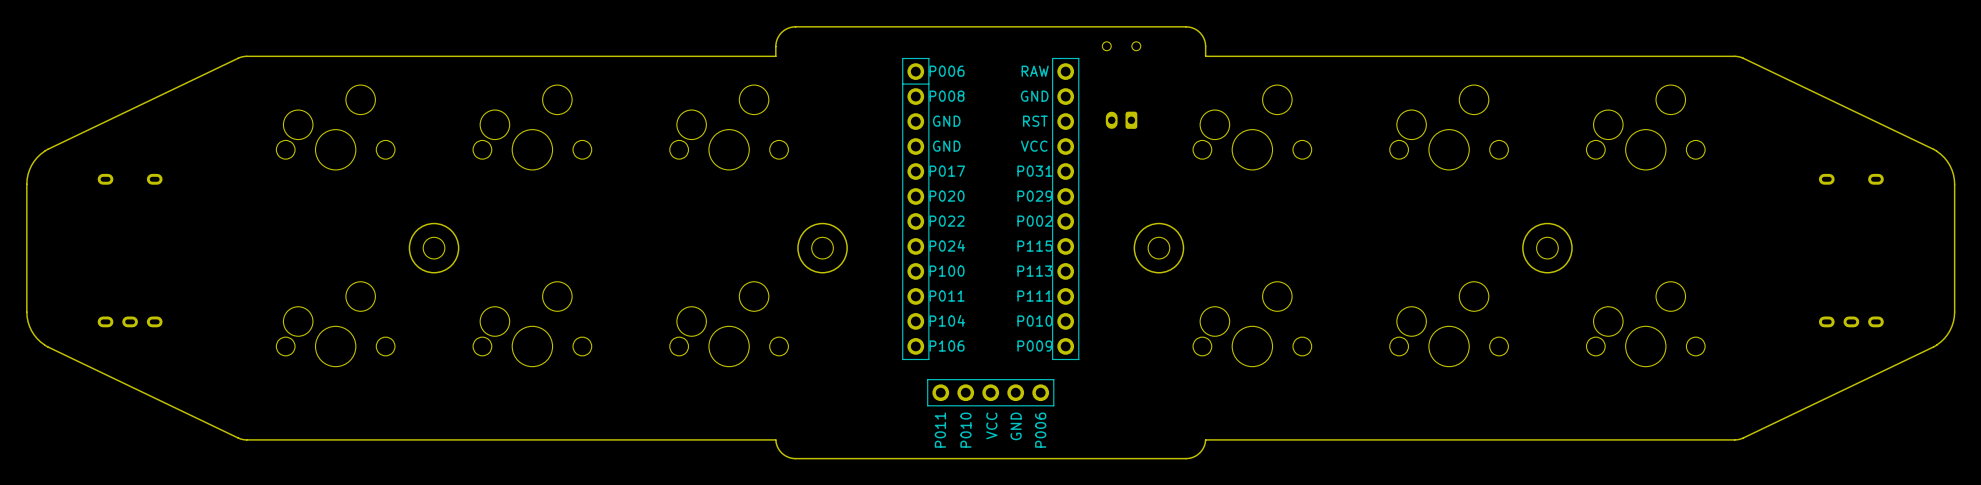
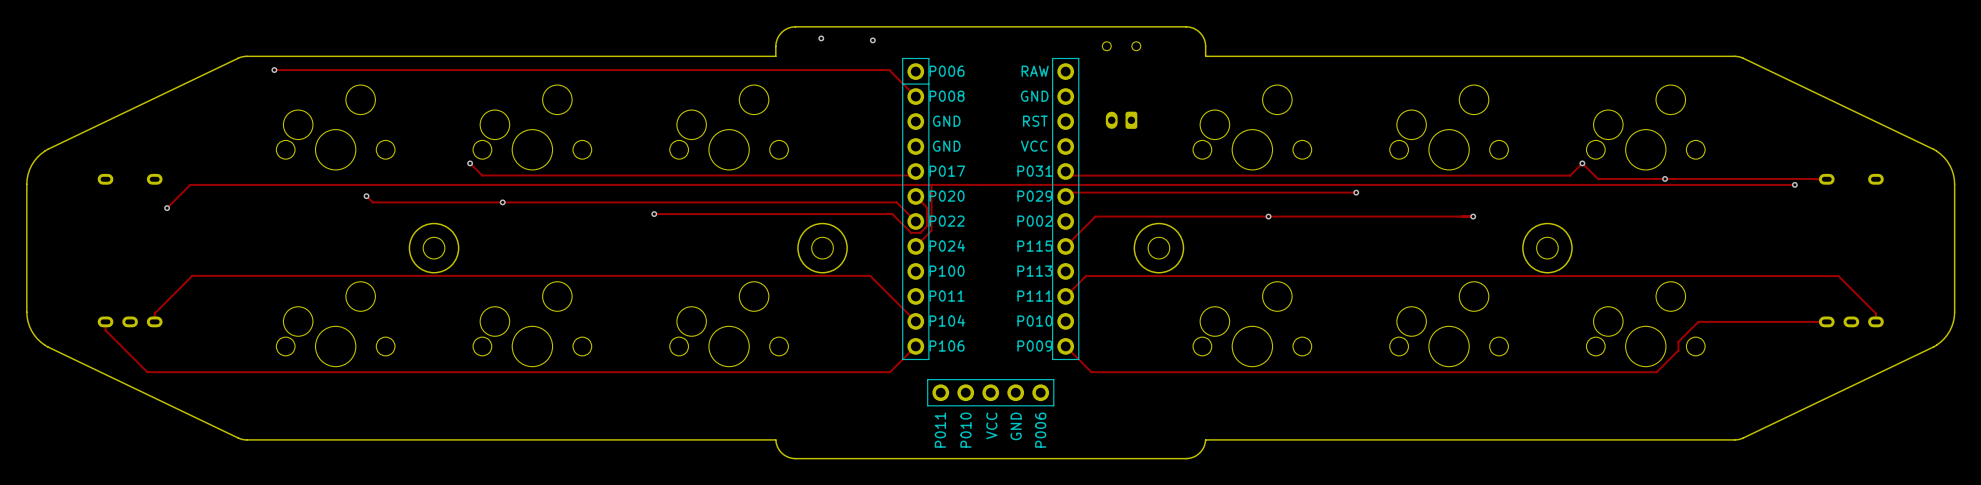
via: none -> (821, 38)
via: none -> (872, 40)
track: none -> (274, 70) (889, 70) (915, 96)
via: none -> (274, 70)
track: none -> (470, 163) (482, 175) (911, 175) (915, 171)
via: none -> (470, 163)
via: none -> (1582, 163)
track: none -> (1065, 171) (1069, 175) (1570, 175) (1582, 163) (1597, 178) (1826, 179)
via: none -> (1665, 178)
track: none -> (931, 184) (931, 230) (915, 246)
track: none -> (1794, 184) (190, 184) (167, 208)
via: none -> (1794, 184)
track: none -> (1356, 192) (1069, 192) (1065, 196)
via: none -> (1356, 192)
track: none -> (366, 196) (372, 202) (896, 202) (915, 221)
via: none -> (366, 196)
track: none -> (915, 196) (927, 207) (927, 226) (920, 232) (911, 232) (892, 214) (654, 214)
via: none -> (502, 202)
via: none -> (167, 208)
via: none -> (654, 214)
via: none -> (1268, 216)
track: none -> (1473, 216) (1095, 216) (1065, 246)
via: none -> (1473, 216)
track: none -> (1065, 296) (1086, 276) (1838, 276) (1875, 313) (1875, 321)
track: none -> (105, 321) (105, 330) (147, 372) (889, 372) (915, 346)
track: none -> (915, 321) (870, 275) (192, 275) (154, 313) (154, 321)
track: none -> (1826, 321) (1698, 321) (1678, 341) (1678, 350) (1656, 372) (1091, 372) (1065, 346)

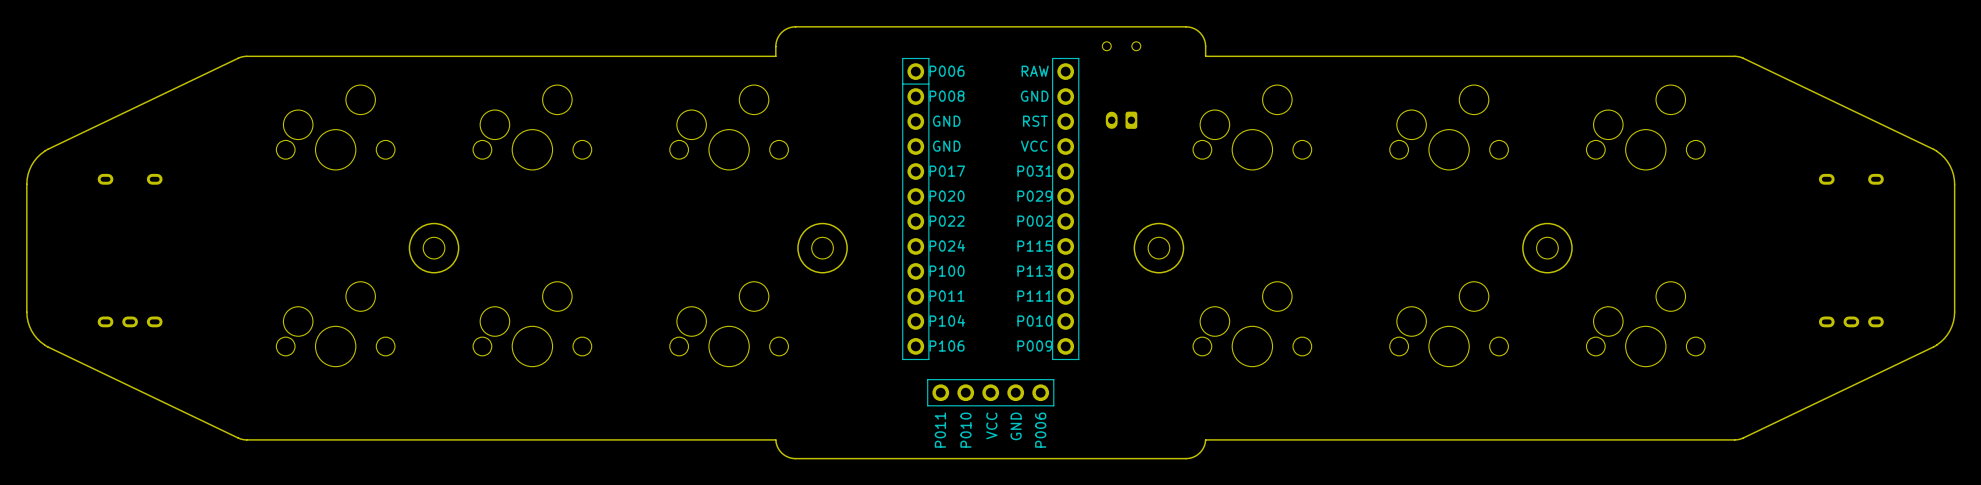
via: (821, 38) -> none
via: (872, 40) -> none
track: (274, 70) (889, 70) (915, 96) -> none
via: (274, 70) -> none
track: (470, 163) (482, 175) (911, 175) (915, 171) -> none
via: (470, 163) -> none
via: (1582, 163) -> none
track: (1065, 171) (1069, 175) (1570, 175) (1582, 163) (1597, 178) (1826, 179) -> none
via: (1665, 178) -> none
track: (931, 184) (931, 230) (915, 246) -> none
track: (1794, 184) (190, 184) (167, 208) -> none
via: (1794, 184) -> none
track: (1356, 192) (1069, 192) (1065, 196) -> none
via: (1356, 192) -> none
track: (366, 196) (372, 202) (896, 202) (915, 221) -> none
via: (366, 196) -> none
track: (915, 196) (927, 207) (927, 226) (920, 232) (911, 232) (892, 214) (654, 214) -> none
via: (502, 202) -> none
via: (167, 208) -> none
via: (654, 214) -> none
via: (1268, 216) -> none
track: (1473, 216) (1095, 216) (1065, 246) -> none
via: (1473, 216) -> none
track: (1065, 296) (1086, 276) (1838, 276) (1875, 313) (1875, 321) -> none
track: (105, 321) (105, 330) (147, 372) (889, 372) (915, 346) -> none
track: (915, 321) (870, 275) (192, 275) (154, 313) (154, 321) -> none
track: (1826, 321) (1698, 321) (1678, 341) (1678, 350) (1656, 372) (1091, 372) (1065, 346) -> none

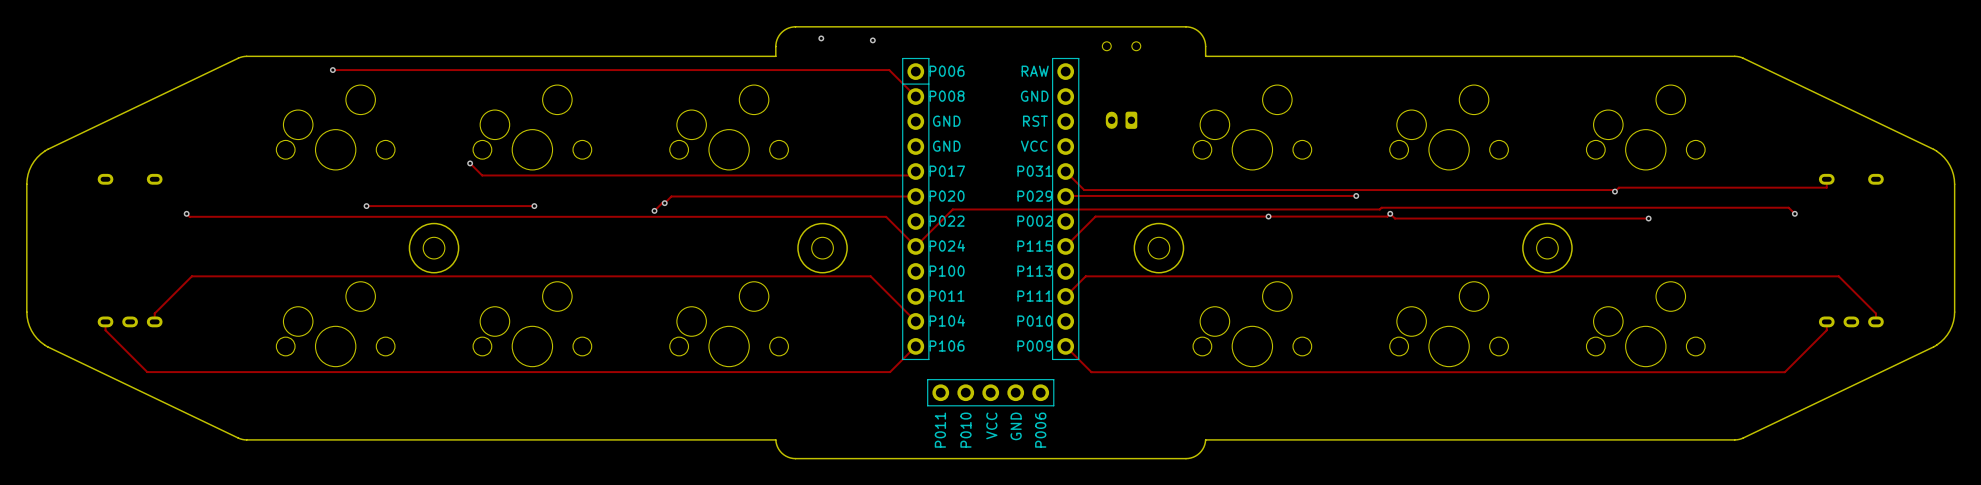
via: none -> (821, 38)
via: none -> (872, 40)
track: none -> (332, 70) (889, 70) (915, 96)
via: none -> (332, 70)
track: none -> (470, 163) (482, 175) (911, 175) (915, 171)
via: none -> (470, 163)
track: none -> (1065, 171) (1084, 190) (1613, 190) (1614, 191) (1618, 187) (1826, 187) (1826, 179)
via: none -> (1614, 191)
track: none -> (1356, 195) (1065, 196)
via: none -> (1356, 195)
track: none -> (915, 196) (671, 196) (654, 210)
via: none -> (664, 203)
track: none -> (366, 206) (534, 206)
via: none -> (366, 206)
via: none -> (534, 206)
via: none -> (654, 210)
track: none -> (186, 213) (189, 216) (886, 216) (915, 246) (952, 209) (1788, 207) (1794, 213)
via: none -> (186, 213)
via: none -> (1390, 213)
via: none -> (1794, 213)
via: none -> (1268, 216)
track: none -> (1648, 218) (1394, 218) (1390, 213) (1387, 216) (1095, 216) (1065, 246)
via: none -> (1648, 218)
track: none -> (1065, 296) (1085, 276) (1838, 276) (1875, 313) (1875, 321)
track: none -> (105, 321) (105, 330) (147, 372) (890, 372) (915, 346)
track: none -> (915, 321) (870, 276) (191, 276) (154, 313) (154, 321)
track: none -> (1826, 321) (1826, 330) (1784, 372) (1091, 372) (1065, 346)

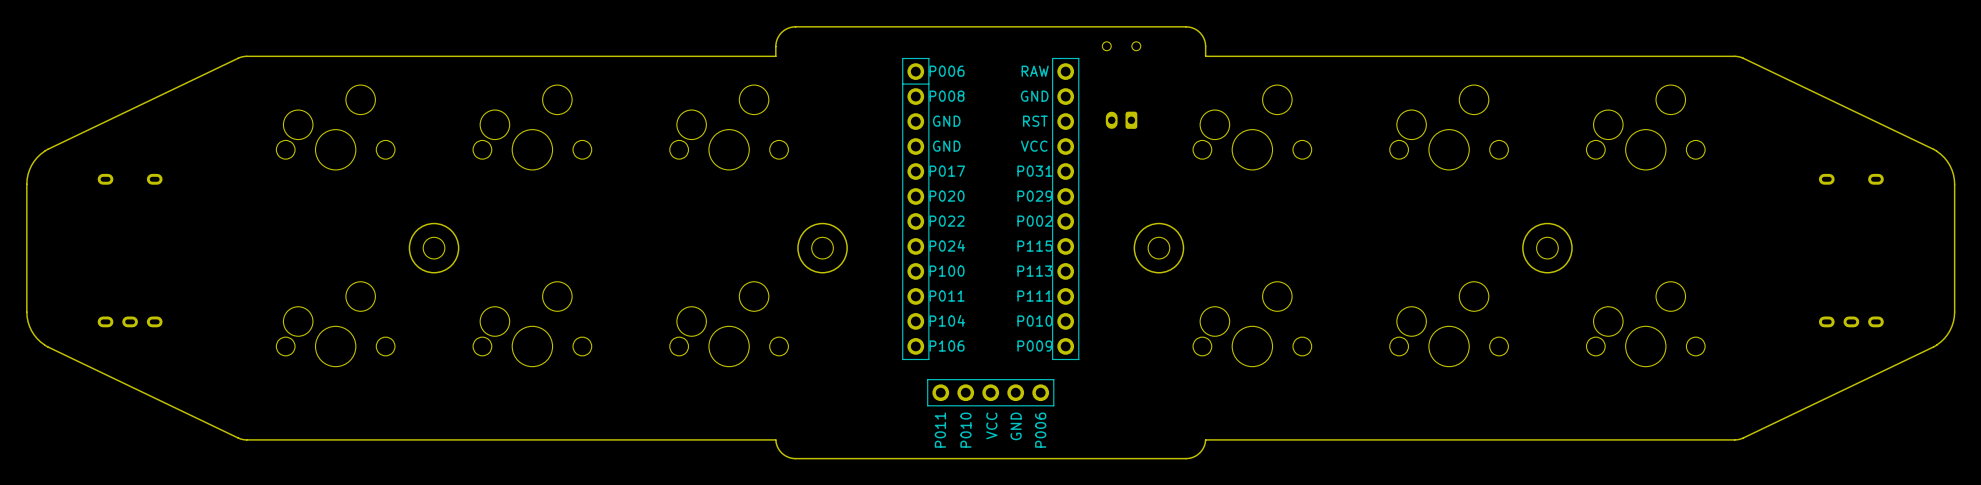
via: (821, 38) -> none
via: (872, 40) -> none
track: (332, 70) (889, 70) (915, 96) -> none
via: (332, 70) -> none
track: (470, 163) (482, 175) (911, 175) (915, 171) -> none
via: (470, 163) -> none
track: (1065, 171) (1084, 190) (1613, 190) (1614, 191) (1618, 187) (1826, 187) (1826, 179) -> none
via: (1614, 191) -> none
track: (1356, 195) (1065, 196) -> none
via: (1356, 195) -> none
track: (915, 196) (671, 196) (654, 210) -> none
via: (664, 203) -> none
track: (366, 206) (534, 206) -> none
via: (366, 206) -> none
via: (534, 206) -> none
via: (654, 210) -> none
track: (186, 213) (189, 216) (886, 216) (915, 246) (952, 209) (1788, 207) (1794, 213) -> none
via: (186, 213) -> none
via: (1390, 213) -> none
via: (1794, 213) -> none
via: (1268, 216) -> none
track: (1648, 218) (1394, 218) (1390, 213) (1387, 216) (1095, 216) (1065, 246) -> none
via: (1648, 218) -> none
track: (1065, 296) (1085, 276) (1838, 276) (1875, 313) (1875, 321) -> none
track: (105, 321) (105, 330) (147, 372) (890, 372) (915, 346) -> none
track: (915, 321) (870, 276) (191, 276) (154, 313) (154, 321) -> none
track: (1826, 321) (1826, 330) (1784, 372) (1091, 372) (1065, 346) -> none

